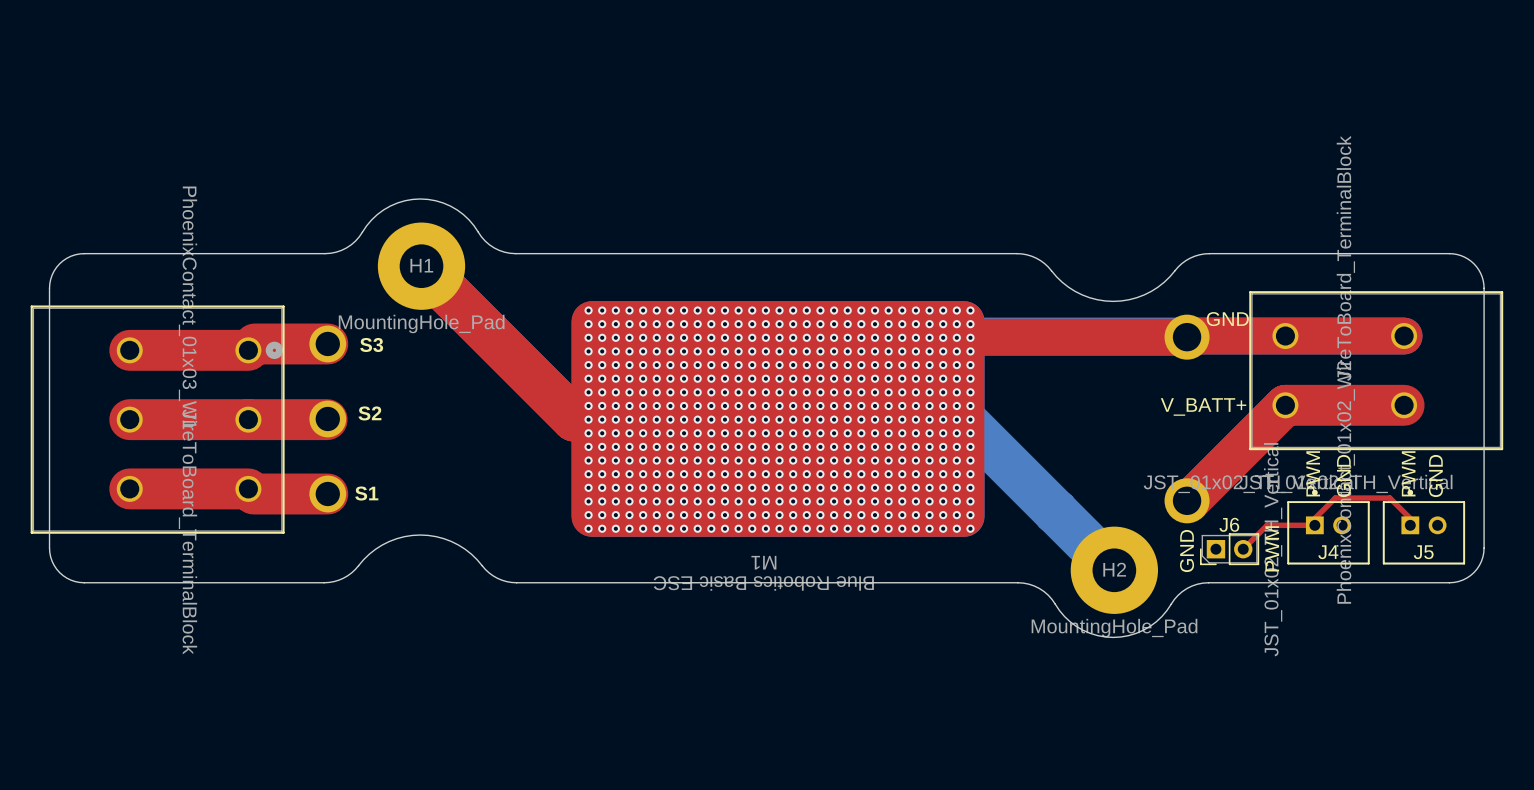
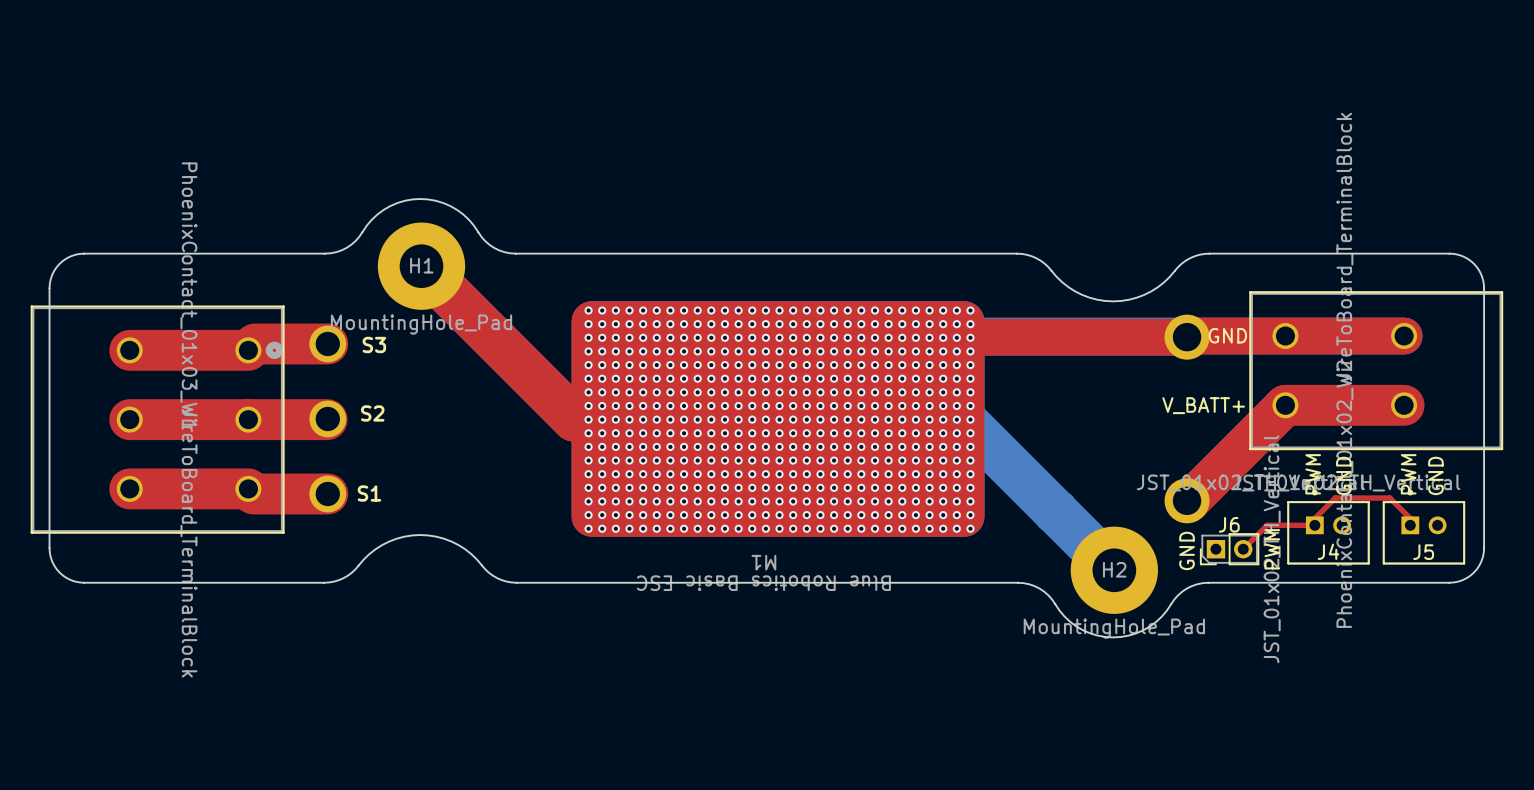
text position: GND (1227, 319) -> GND (1227, 335)

